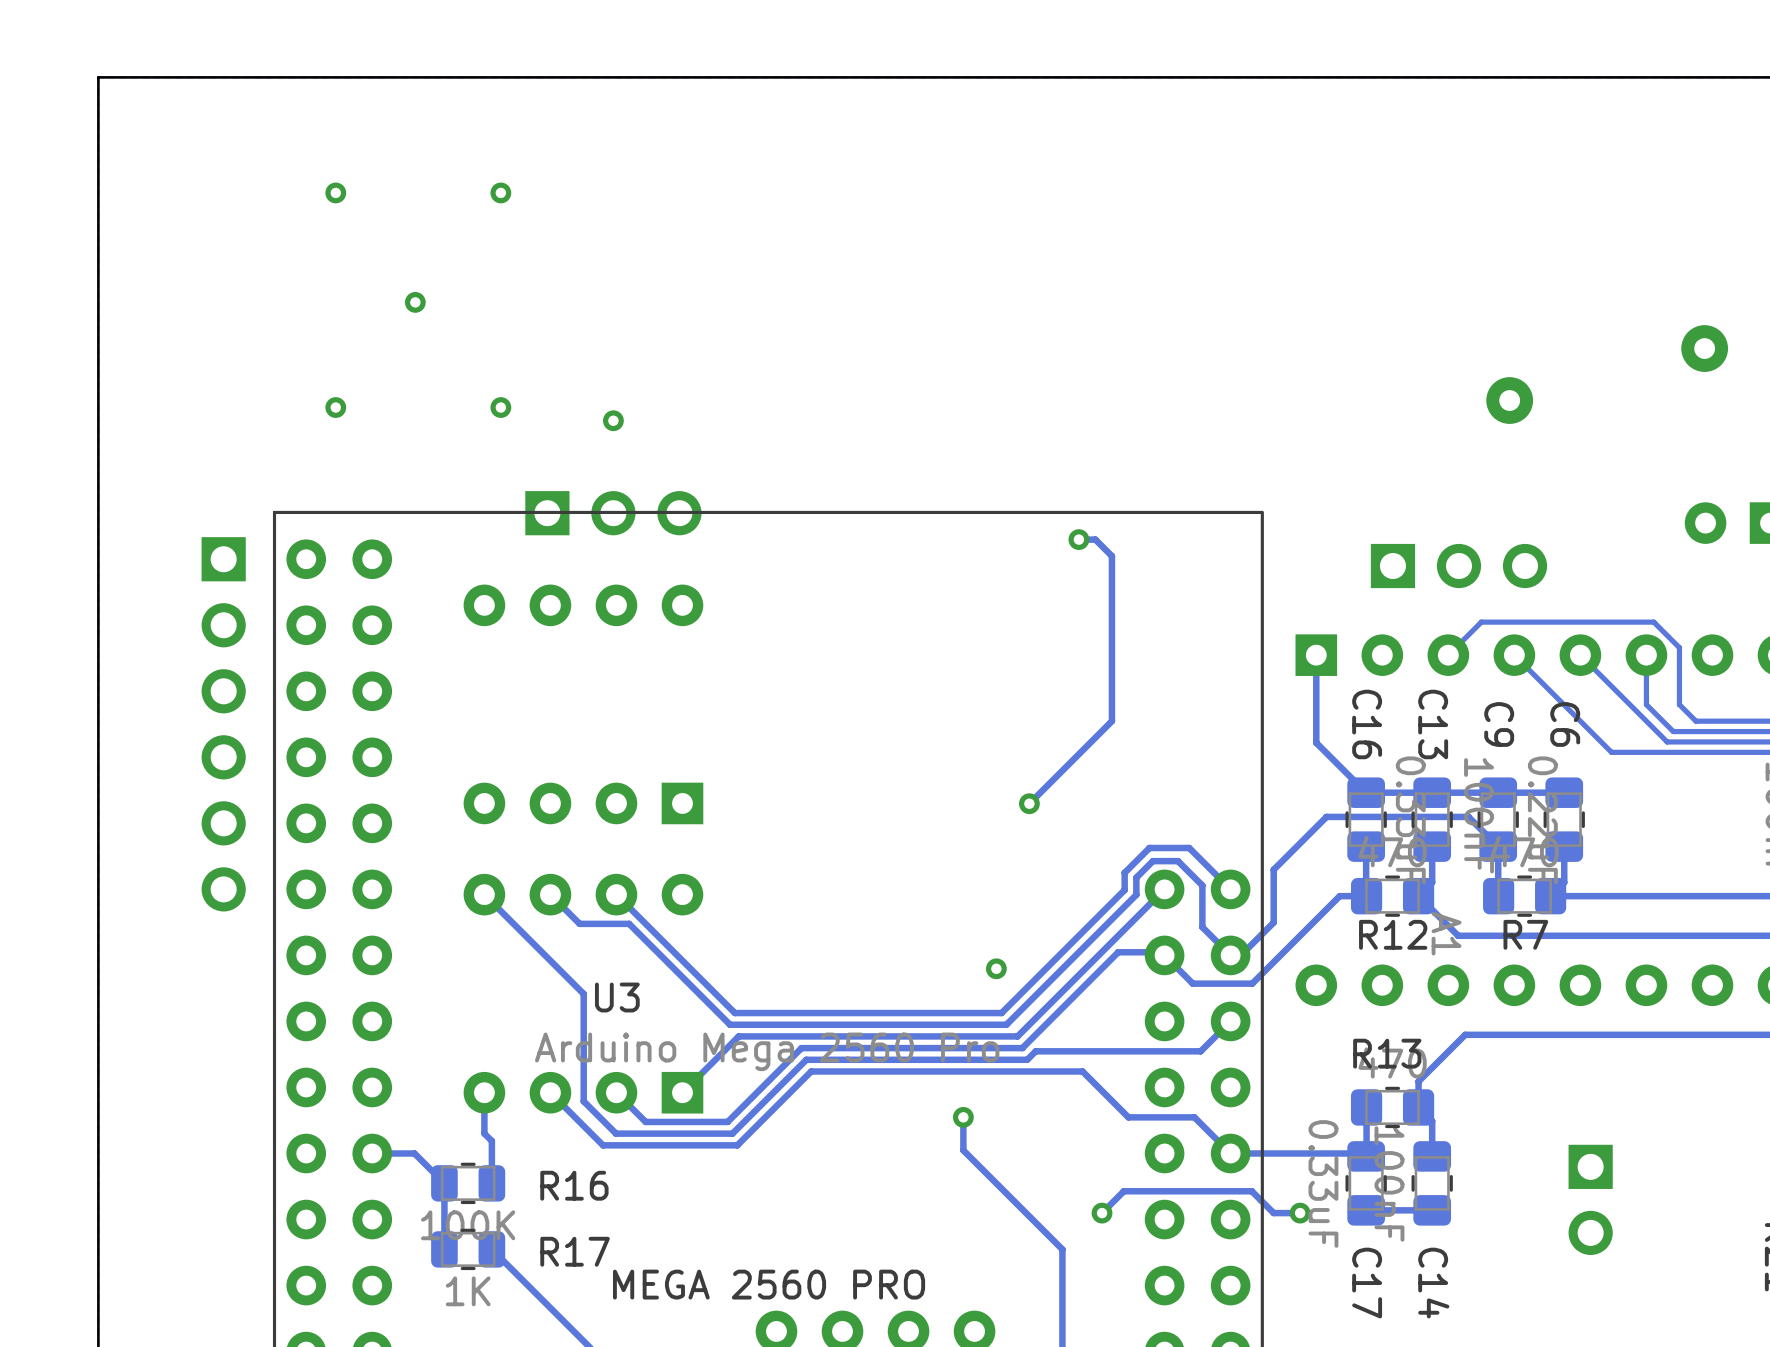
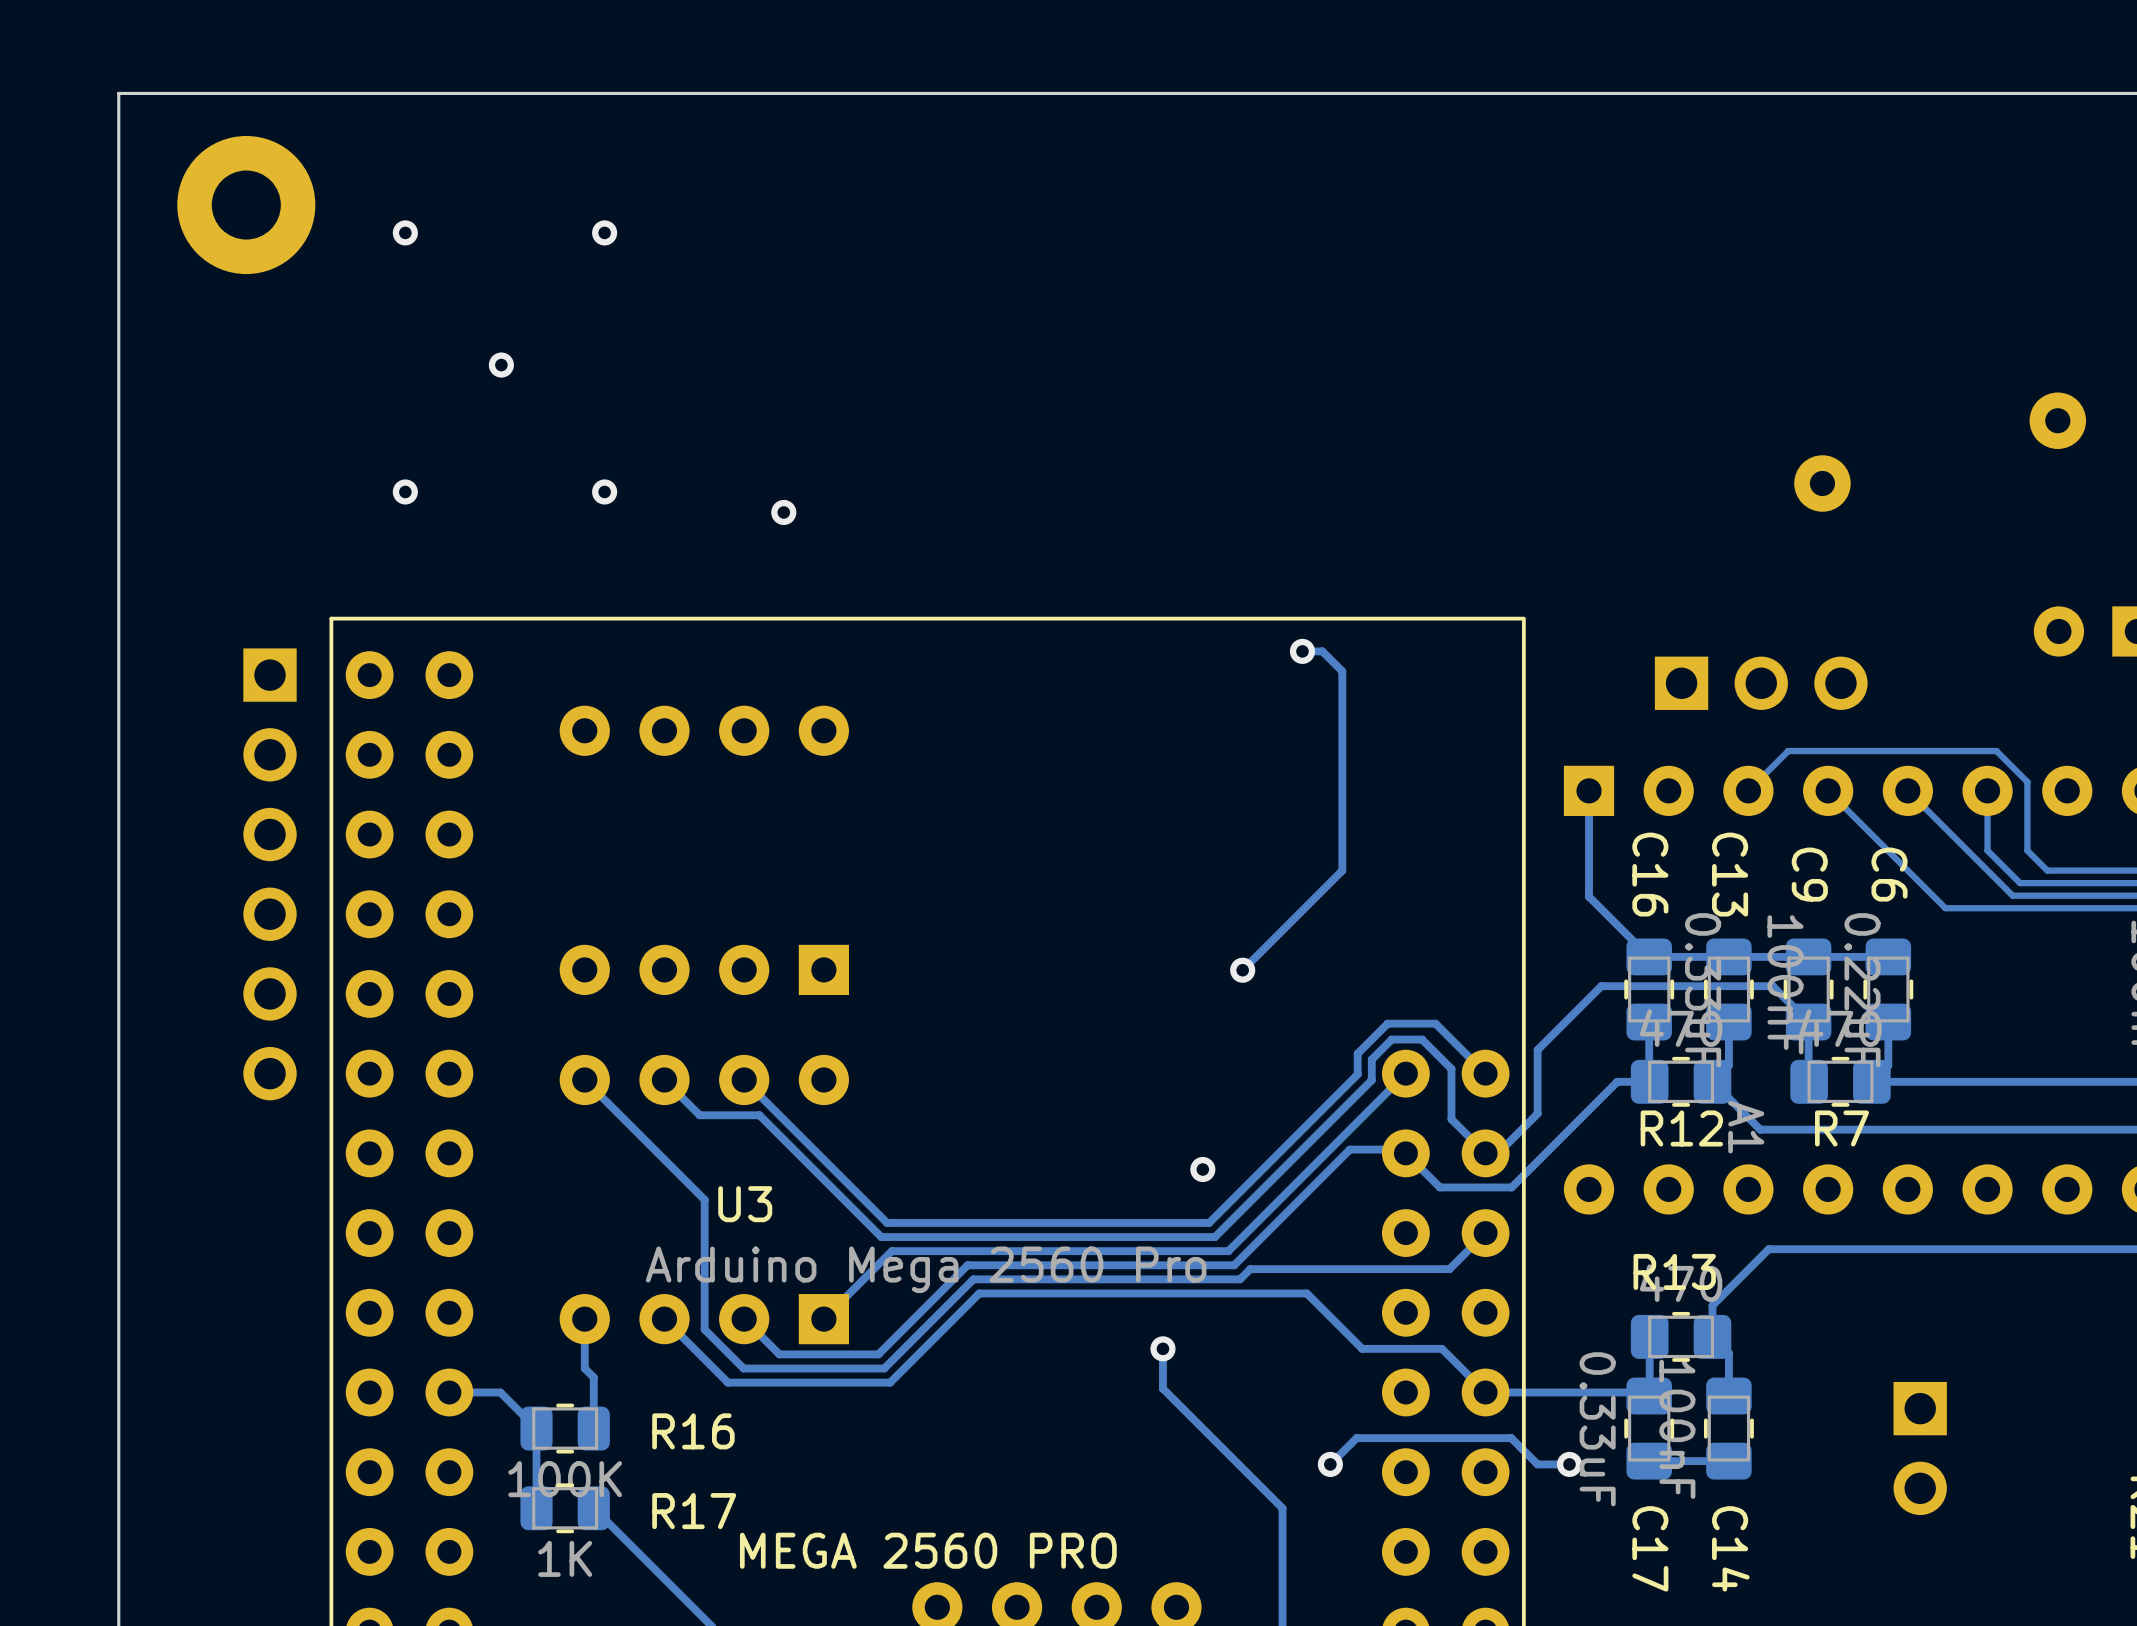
part: none -> (246, 205)
via position: (613, 420) -> (783, 512)
part: (613, 513) -> none

